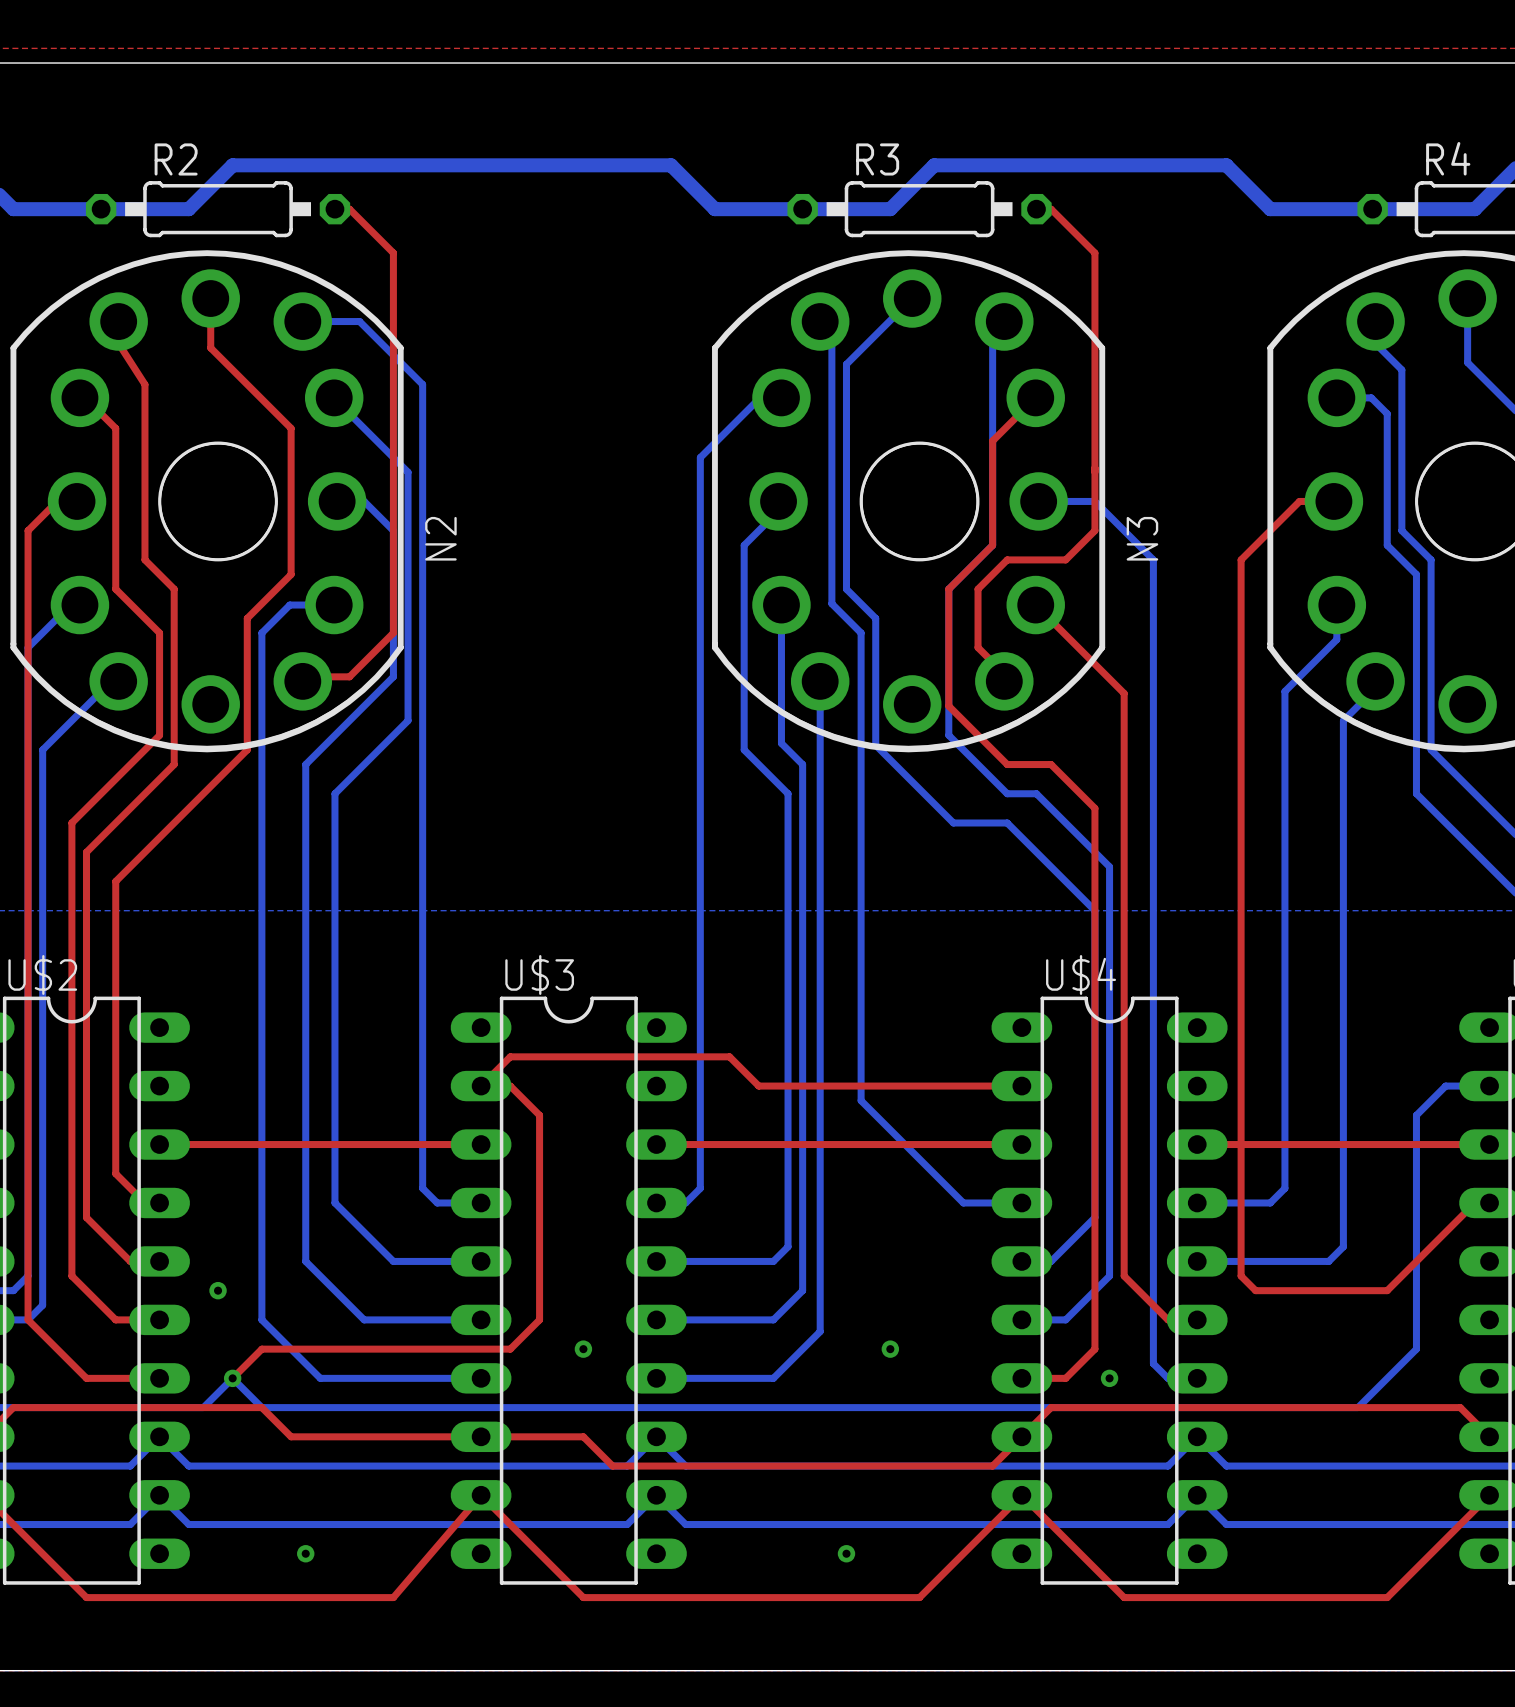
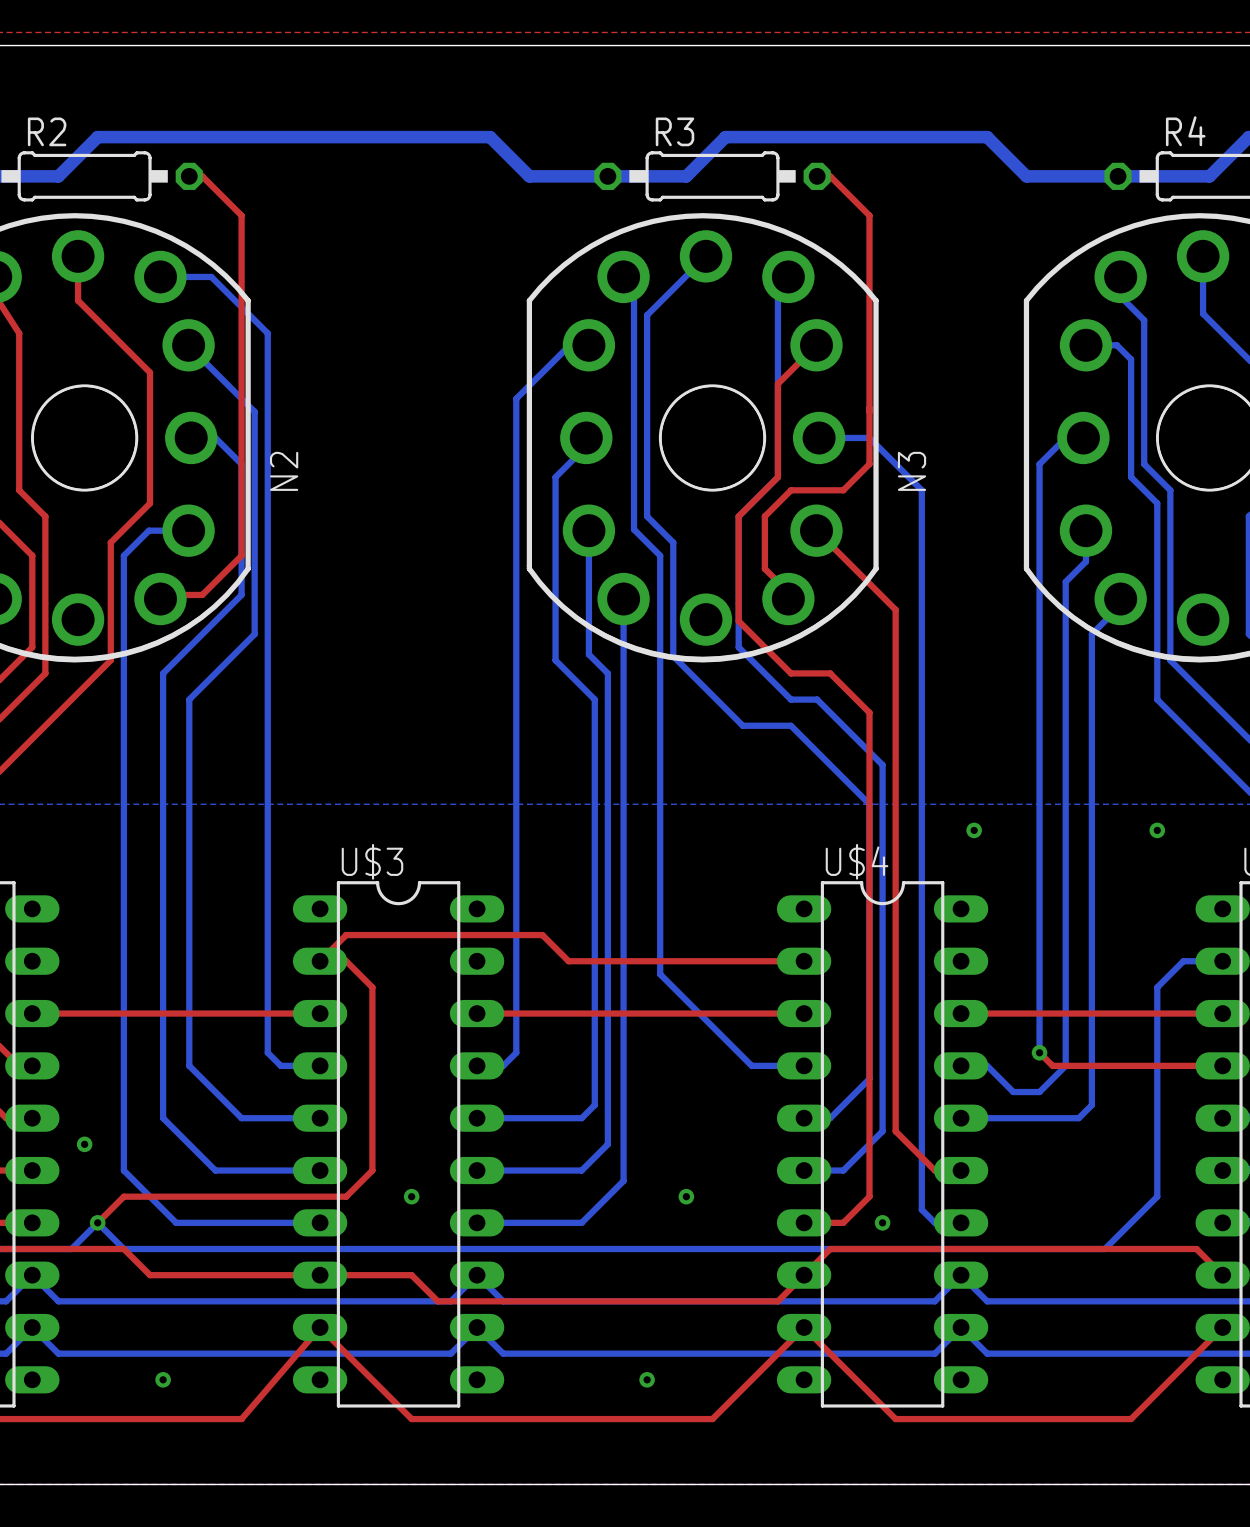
top track: (1333, 501) (1299, 501) (1241, 559) (1241, 1276) (1255, 1290) (1387, 1290) (1474, 1202) -> (1039, 1052) (1052, 1065) (1209, 1065)
bottom track: (1314, 662) (1284, 691) -> (1083, 437) (1065, 437) (1039, 464) (1039, 608)
via: none -> (974, 830)
via: none -> (1157, 830)
bottom track: (1284, 1188) (1270, 1202) (1226, 1202) -> (1065, 581) (1065, 1065) (1039, 1092) (1013, 1092) (987, 1065)
via: none -> (1039, 1052)

